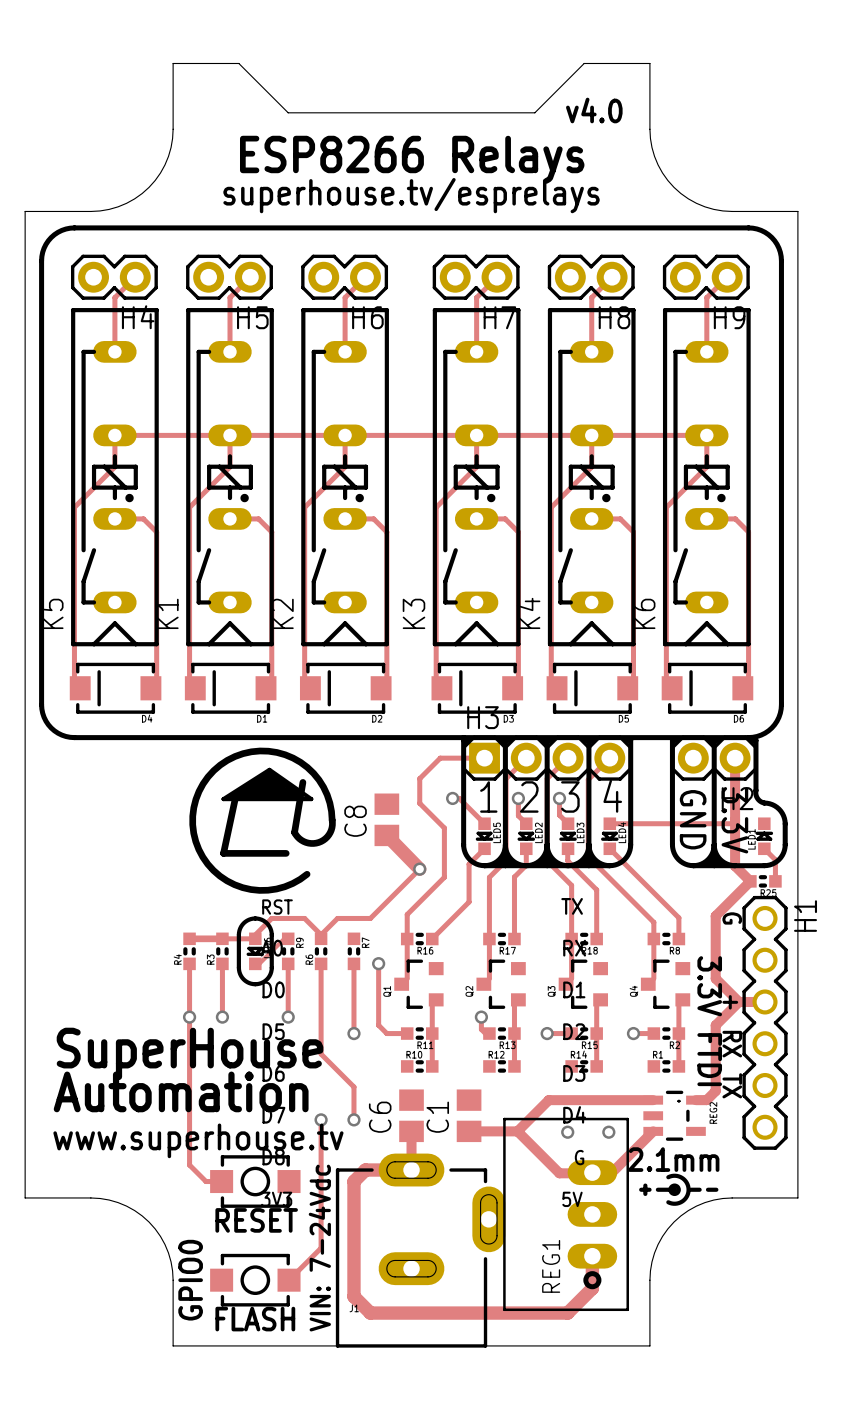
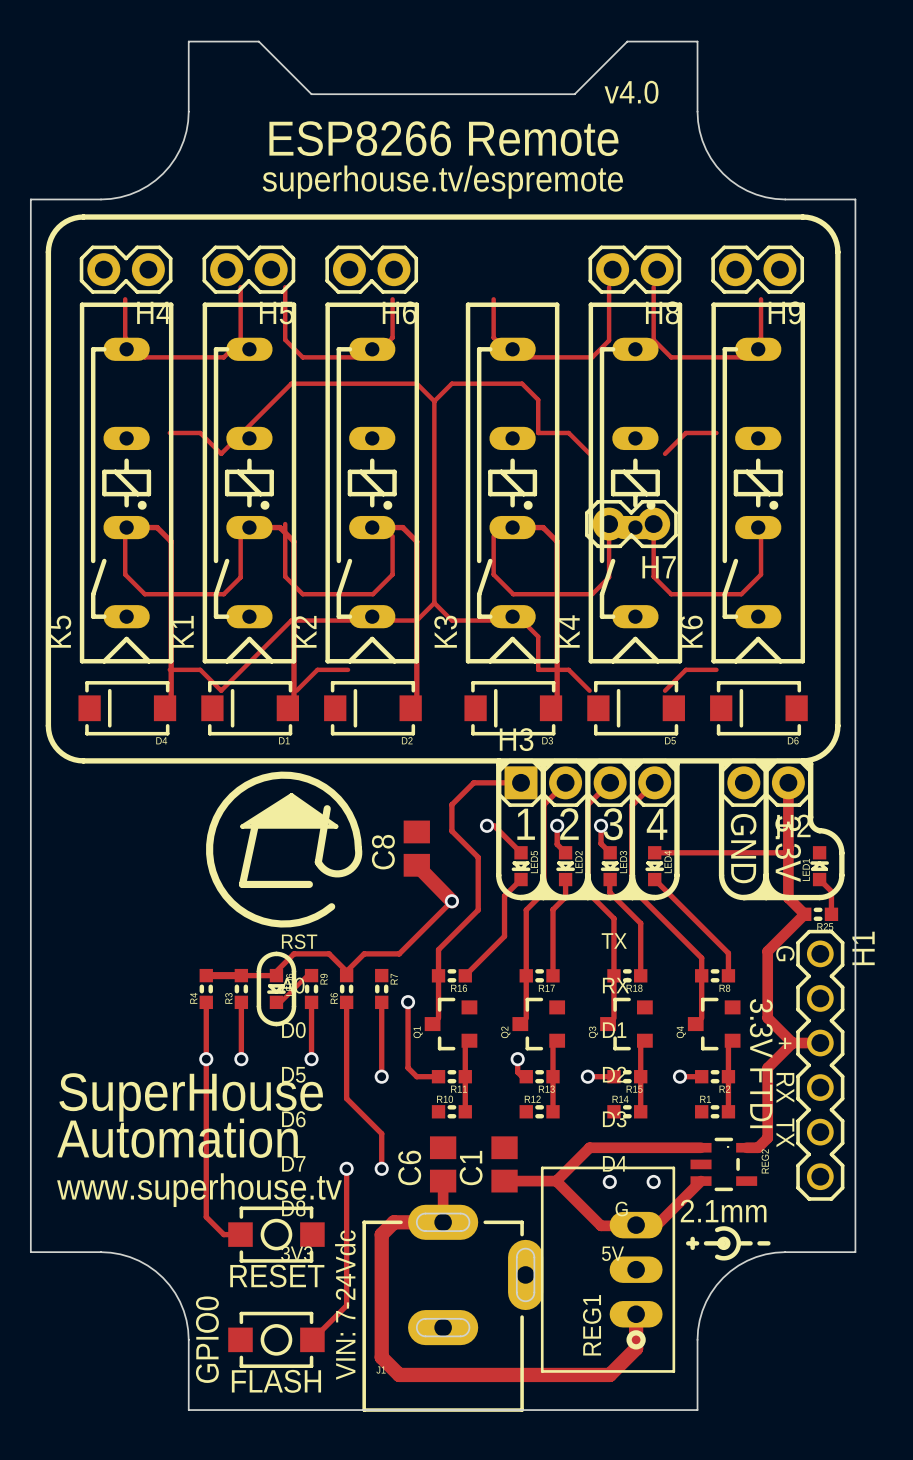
text: ESP8266 Relays (412, 159) -> ESP8266 Remote (443, 138)
text: superhouse.tv/esprelays (411, 195) -> superhouse.tv/espremote (442, 182)
track: (135, 277) (114, 297) (114, 351) -> none
track: (250, 277) (230, 297) (230, 351) -> none
track: (365, 277) (345, 297) (345, 351) -> none
H7 position: (476, 277) -> (631, 524)
track: (497, 277) (476, 297) (476, 351) -> none
track: (612, 277) (591, 297) (591, 351) -> none
track: (727, 277) (706, 297) (706, 351) -> none
track: none -> (240, 287) (240, 340) (223, 357) (144, 357) (125, 337) (125, 299)
track: none -> (285, 287) (285, 339) (302, 357) (372, 357) (392, 337) (392, 299)
track: none -> (609, 287) (609, 340) (592, 357) (513, 357) (493, 337) (493, 299)
track: none -> (653, 287) (653, 339) (671, 357) (741, 357) (761, 337) (761, 299)
track: none -> (434, 401) (416, 383) (291, 383) (221, 453) (200, 432) (169, 432)
track: none -> (434, 401) (451, 383) (522, 383) (538, 399) (538, 432) (568, 432) (589, 453)
track: none -> (434, 401) (434, 603)
track: none -> (716, 432) (685, 432) (665, 453)
track: (230, 435) (230, 466) (189, 507) (189, 682) (195, 688) -> none
track: (345, 435) (345, 466) (304, 507) (304, 682) (310, 688) -> none
track: (476, 435) (476, 466) (436, 507) (436, 682) (441, 688) -> none
track: (591, 435) (591, 466) (551, 507) (551, 682) (557, 688) -> none
track: none -> (240, 524) (240, 577) (223, 594) (144, 594) (125, 574) (125, 536)
track: none -> (285, 524) (285, 576) (302, 594) (372, 594) (392, 574) (392, 536)
track: none -> (609, 524) (609, 577) (592, 594) (513, 594) (493, 574) (493, 536)
track: none -> (653, 524) (653, 576) (671, 594) (741, 594) (761, 574) (761, 536)
track: (591, 518) (620, 518) (633, 532) (633, 682) (627, 688) -> none
track: (706, 518) (735, 518) (748, 532) (748, 682) (742, 688) -> none
track: none -> (434, 603) (451, 620) (522, 620) (538, 636) (538, 669) (568, 669) (589, 690)
track: none -> (434, 603) (416, 620) (291, 620) (221, 690) (200, 669) (169, 669)
track: none -> (348, 669) (317, 669) (296, 690)
track: none -> (716, 669) (685, 669) (665, 690)
track: (80, 688) (74, 682) (74, 507) (114, 466) (114, 435) (706, 435) (706, 466) (666, 507) (666, 682) (672, 688) -> none

